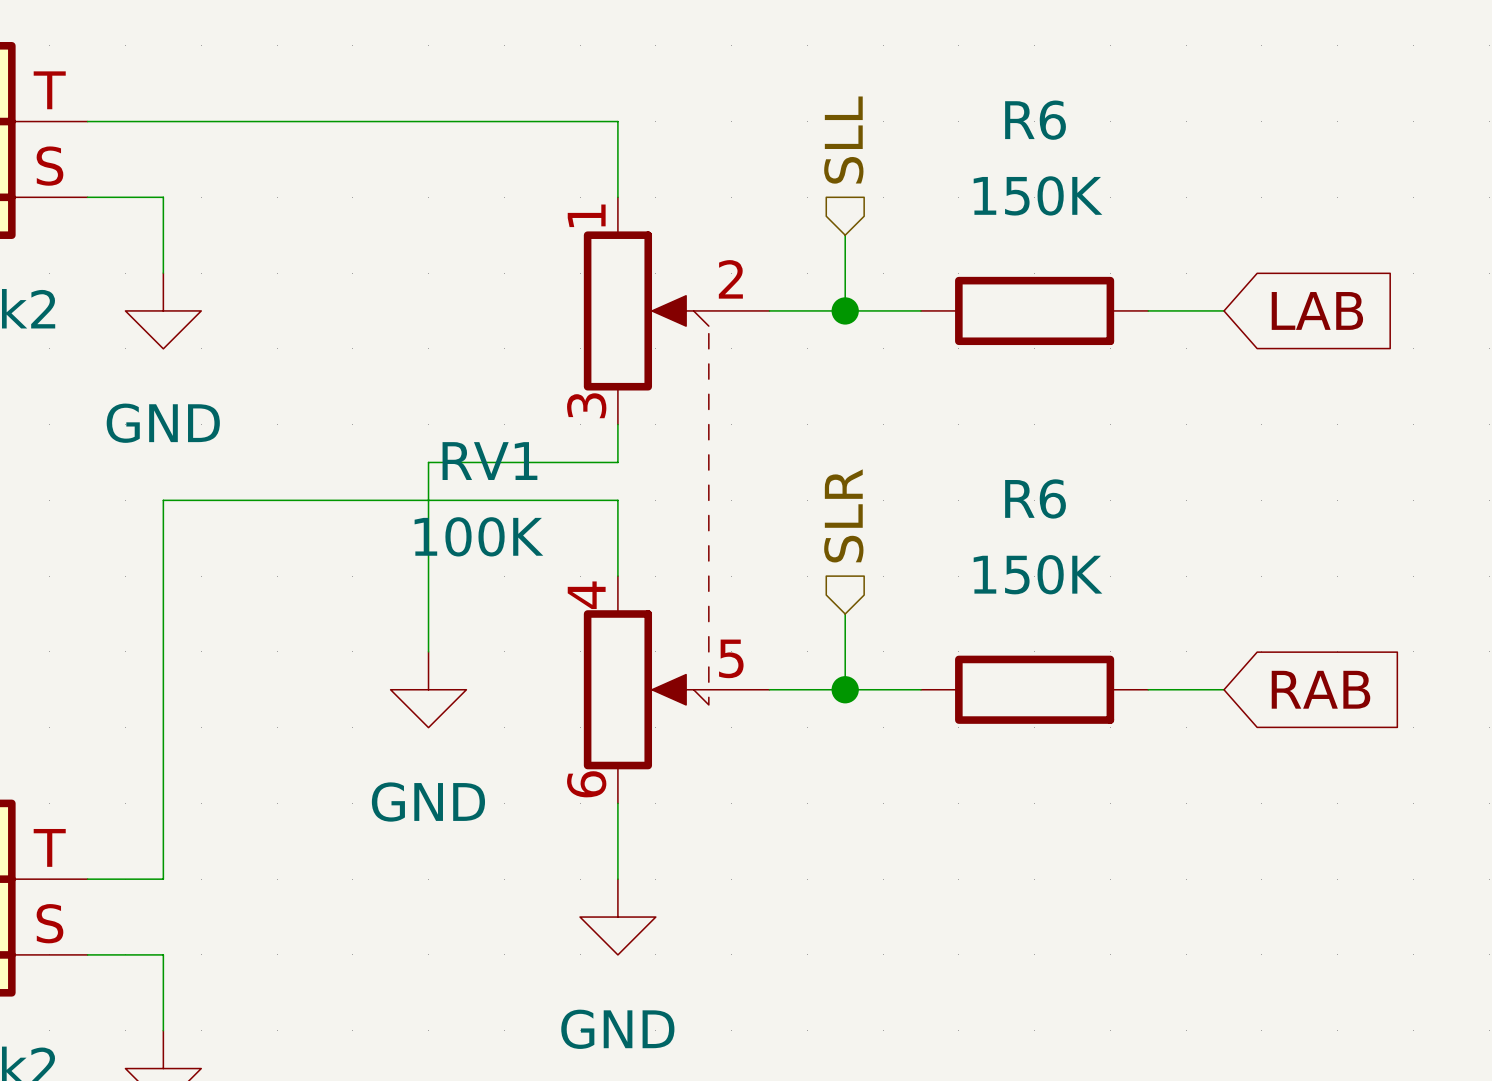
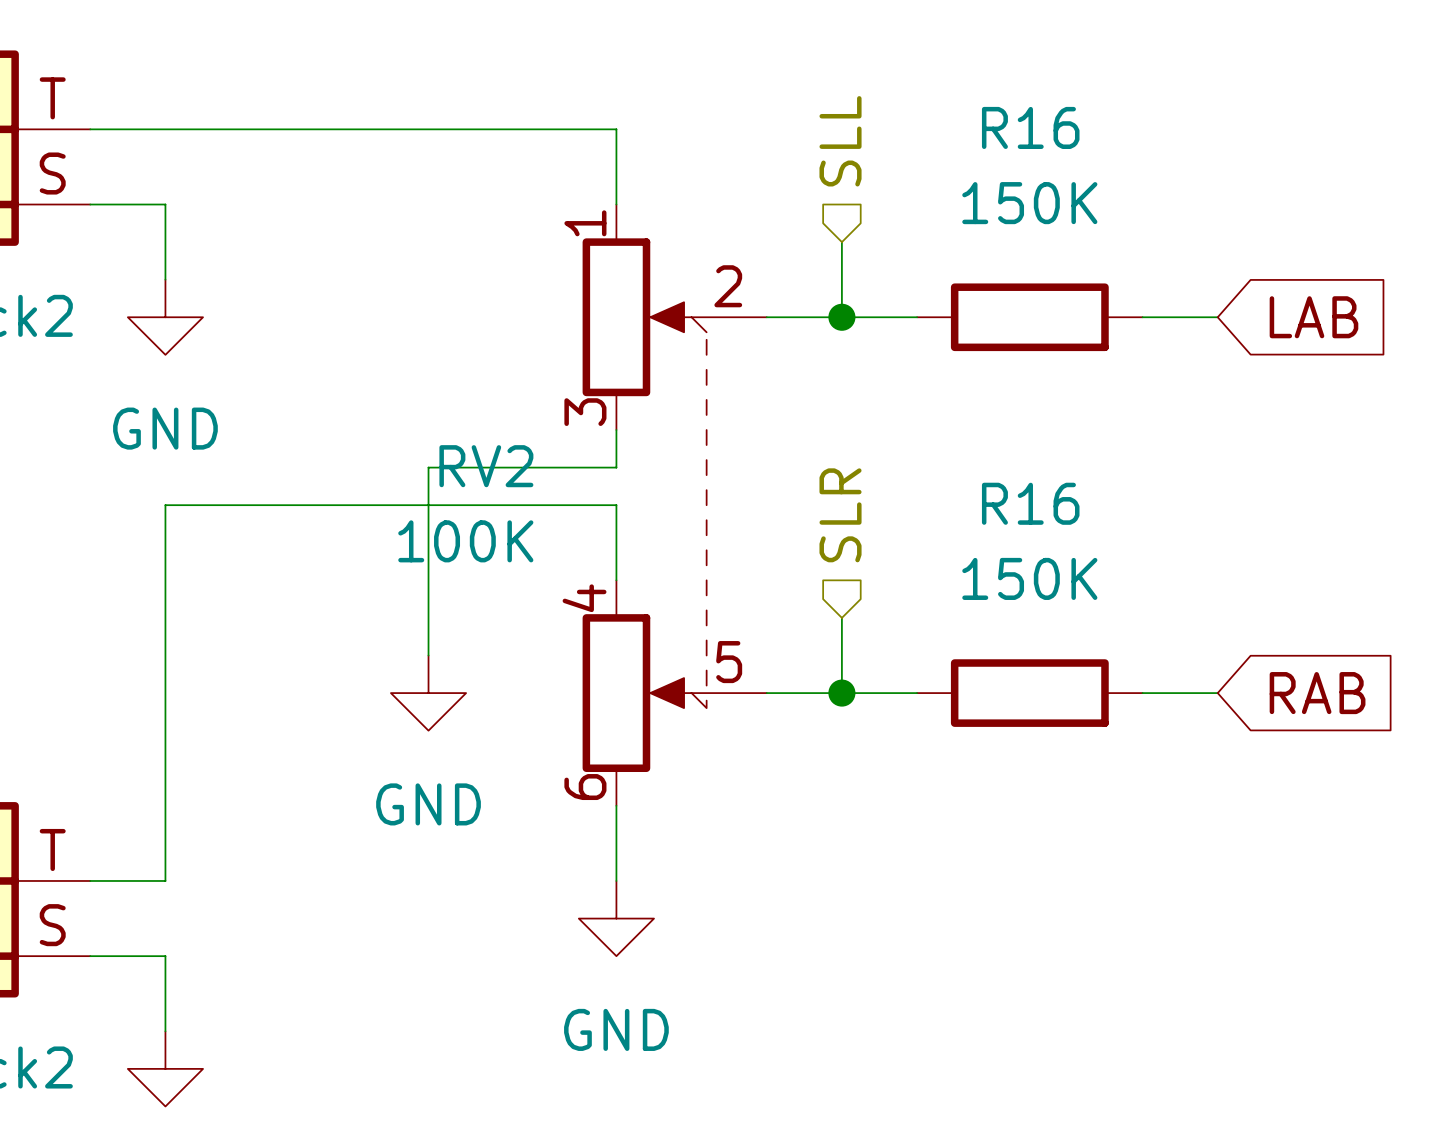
R6 name: R6 (1035, 120) -> R16 (1030, 127)
RV1 name: RV1 (489, 461) -> RV2 (486, 466)
R6 name: R6 (1035, 498) -> R16 (1030, 503)

